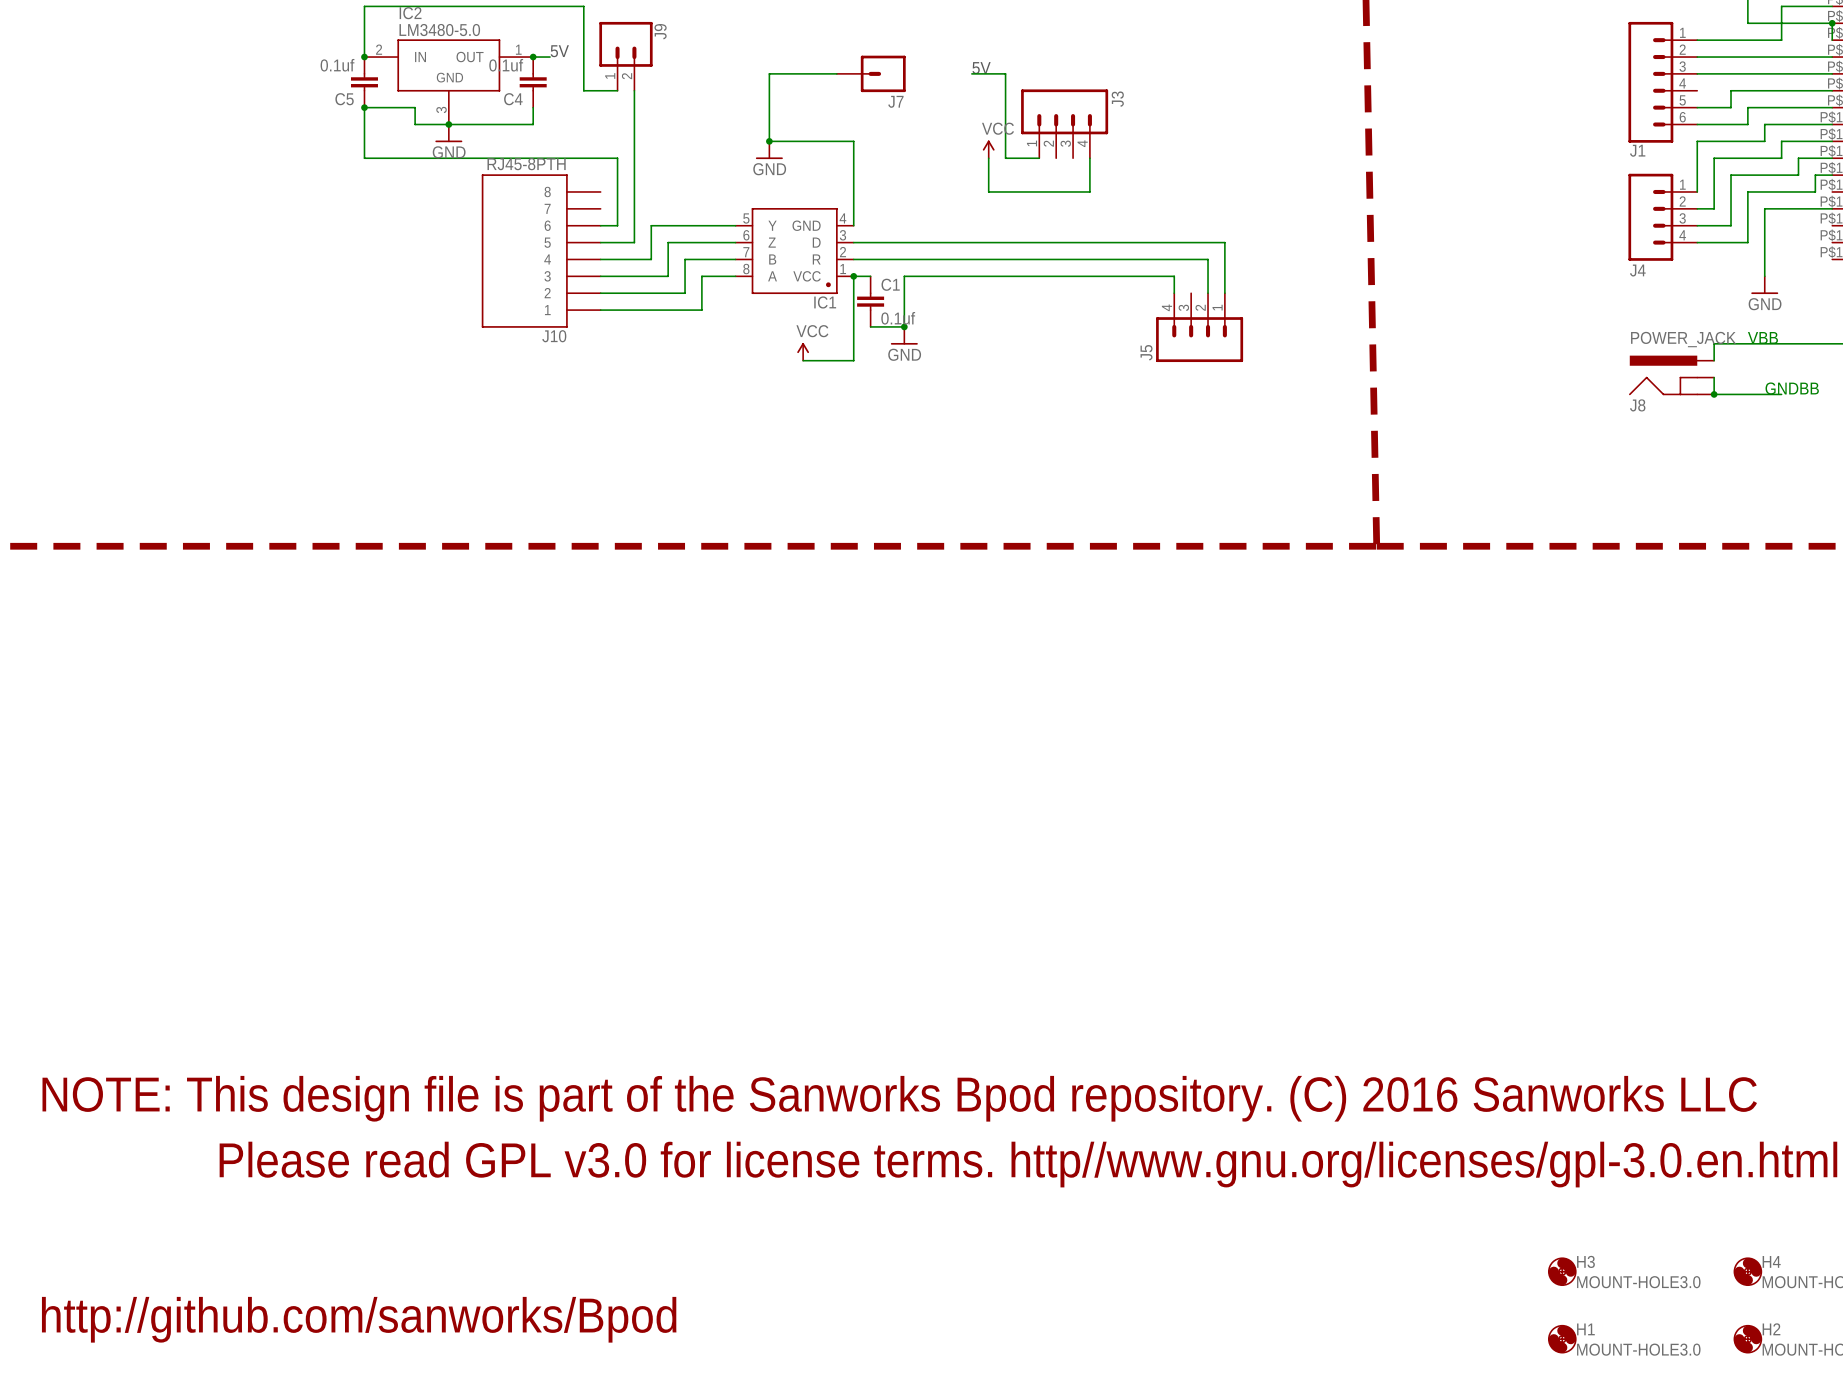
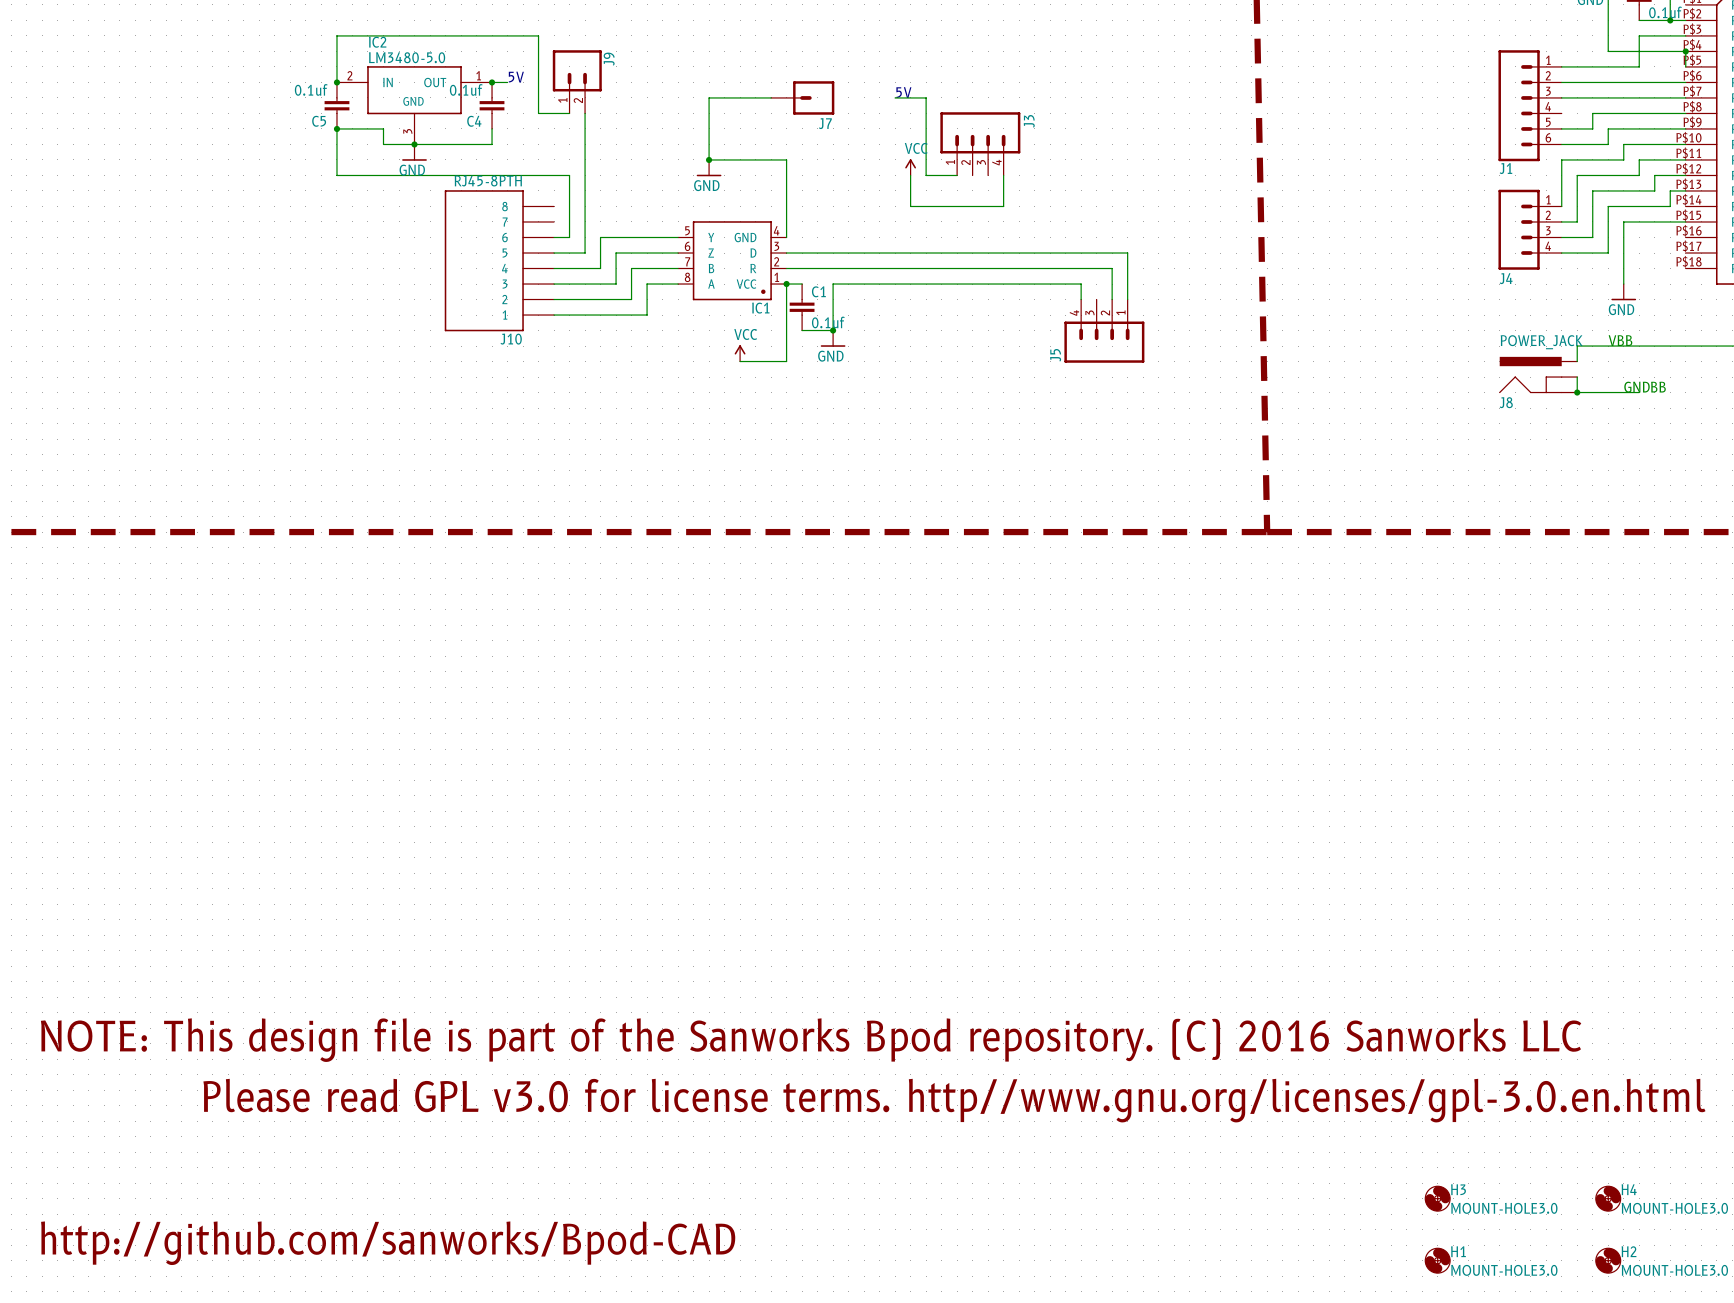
text: http://github.com/sanworks/Bpod (359, 1319) -> http://github.com/sanworks/Bpod-CAD (388, 1243)

